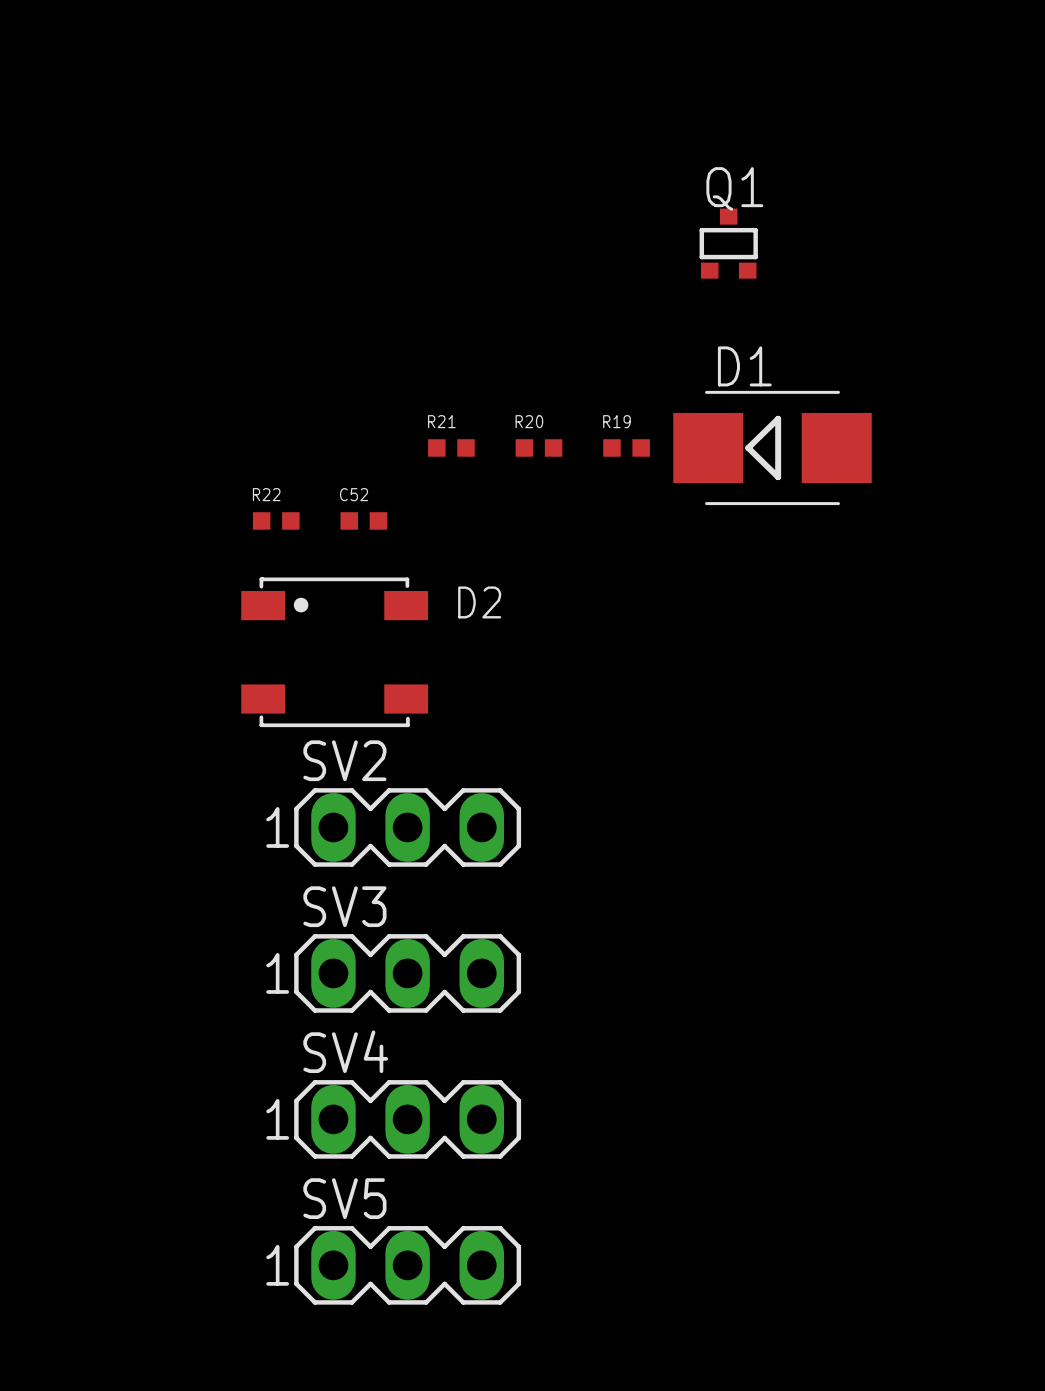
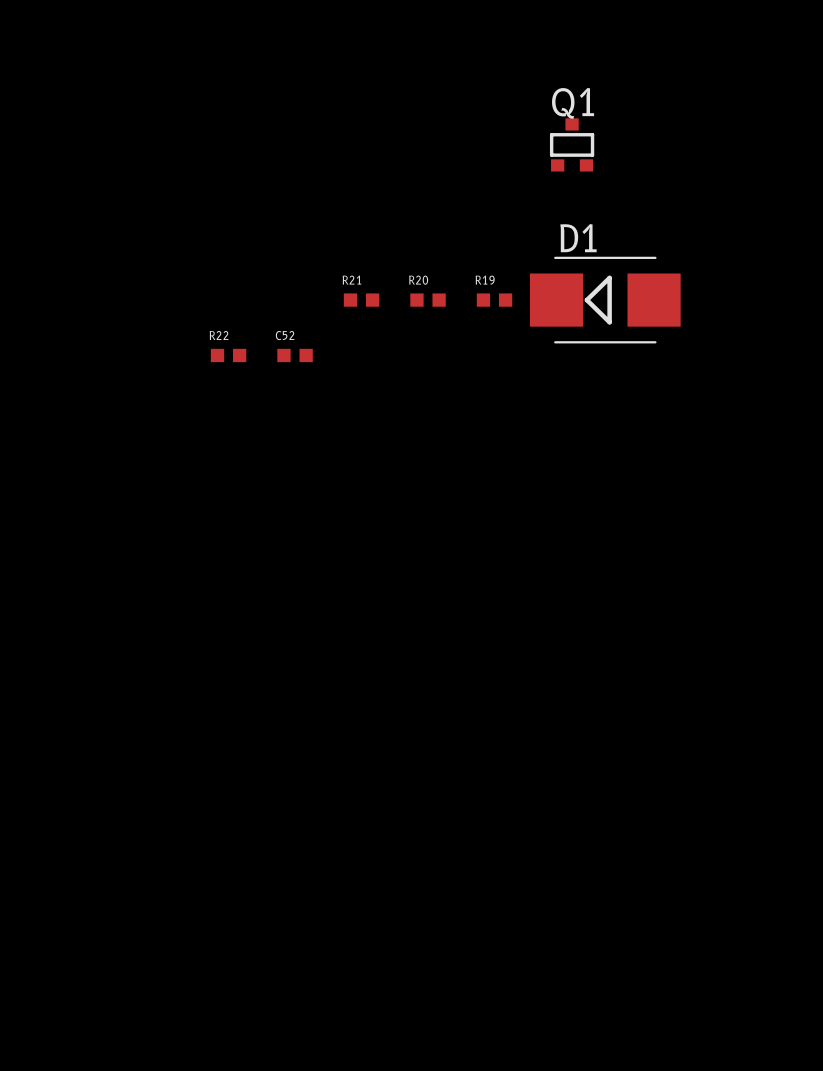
D2: (334, 652) -> none
SV2: (407, 827) -> none
SV3: (407, 973) -> none
SV4: (407, 1119) -> none
SV5: (407, 1265) -> none

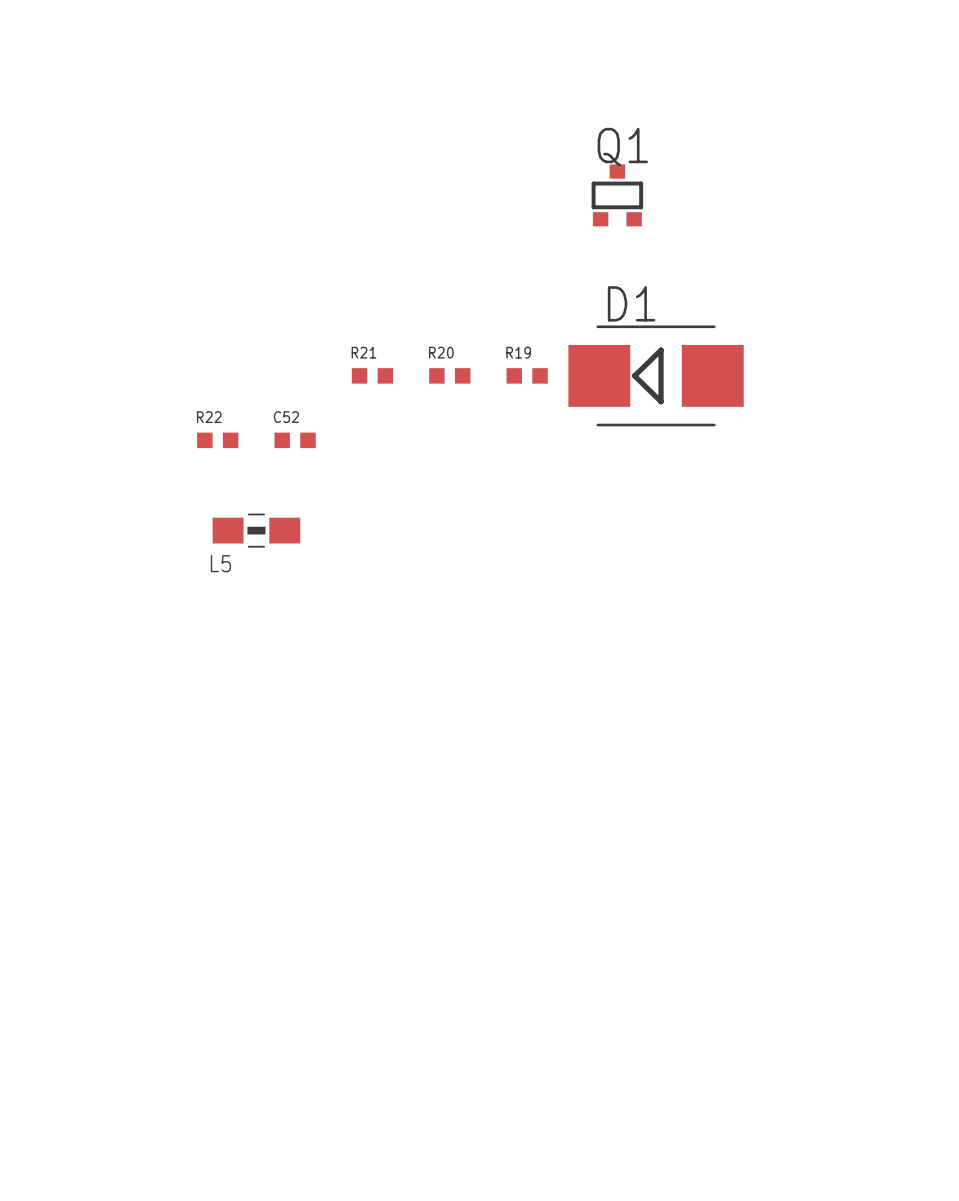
L5: none -> (256, 530)

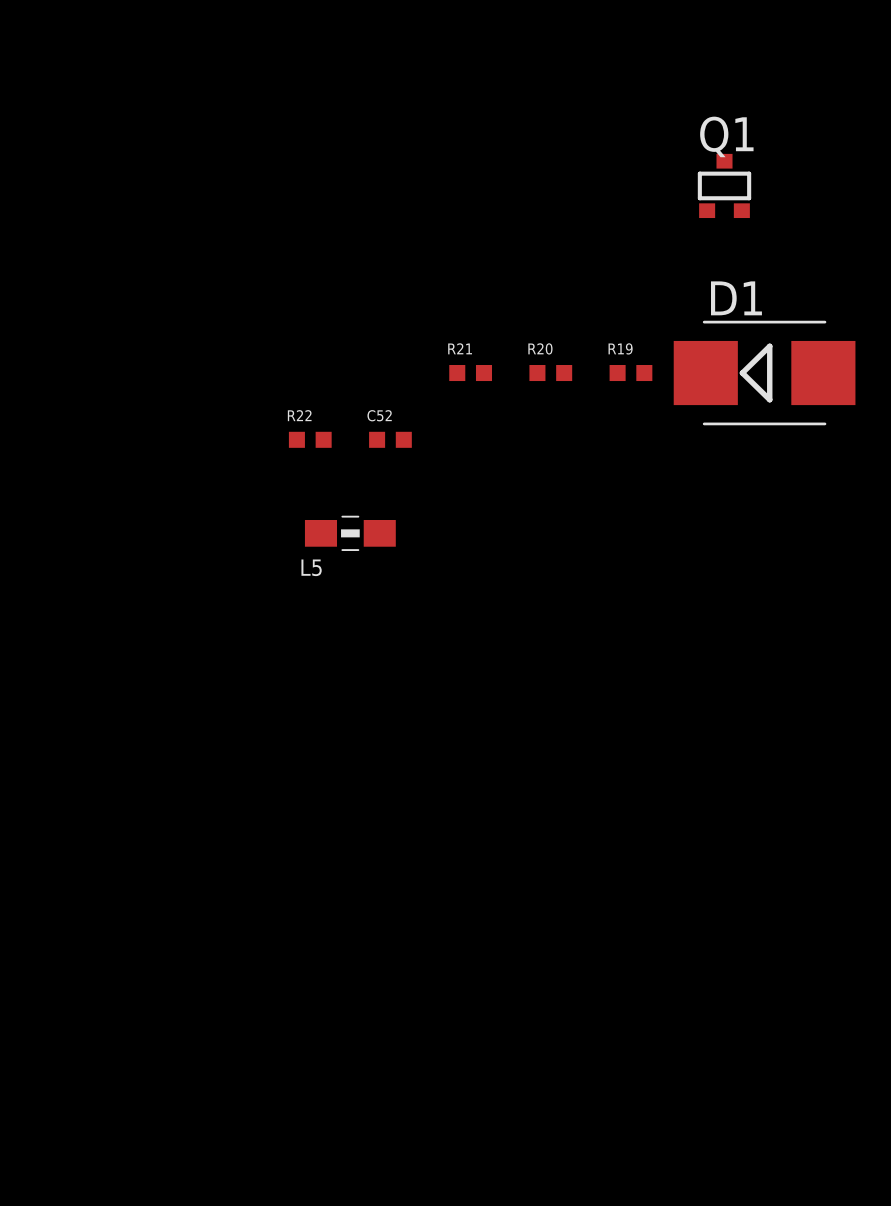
Q1 position: (617, 195) -> (724, 185)
R20 name: R20 (441, 352) -> R21 (460, 348)
R19 name: R19 (518, 352) -> R20 (540, 348)
R21: (372, 375) -> none
R19: none -> (630, 373)
D1 position: (656, 375) -> (764, 373)
C52 name: C52 (286, 417) -> R22 (299, 415)
R22: (217, 440) -> none
C52: none -> (390, 439)
L5 position: (256, 530) -> (350, 533)

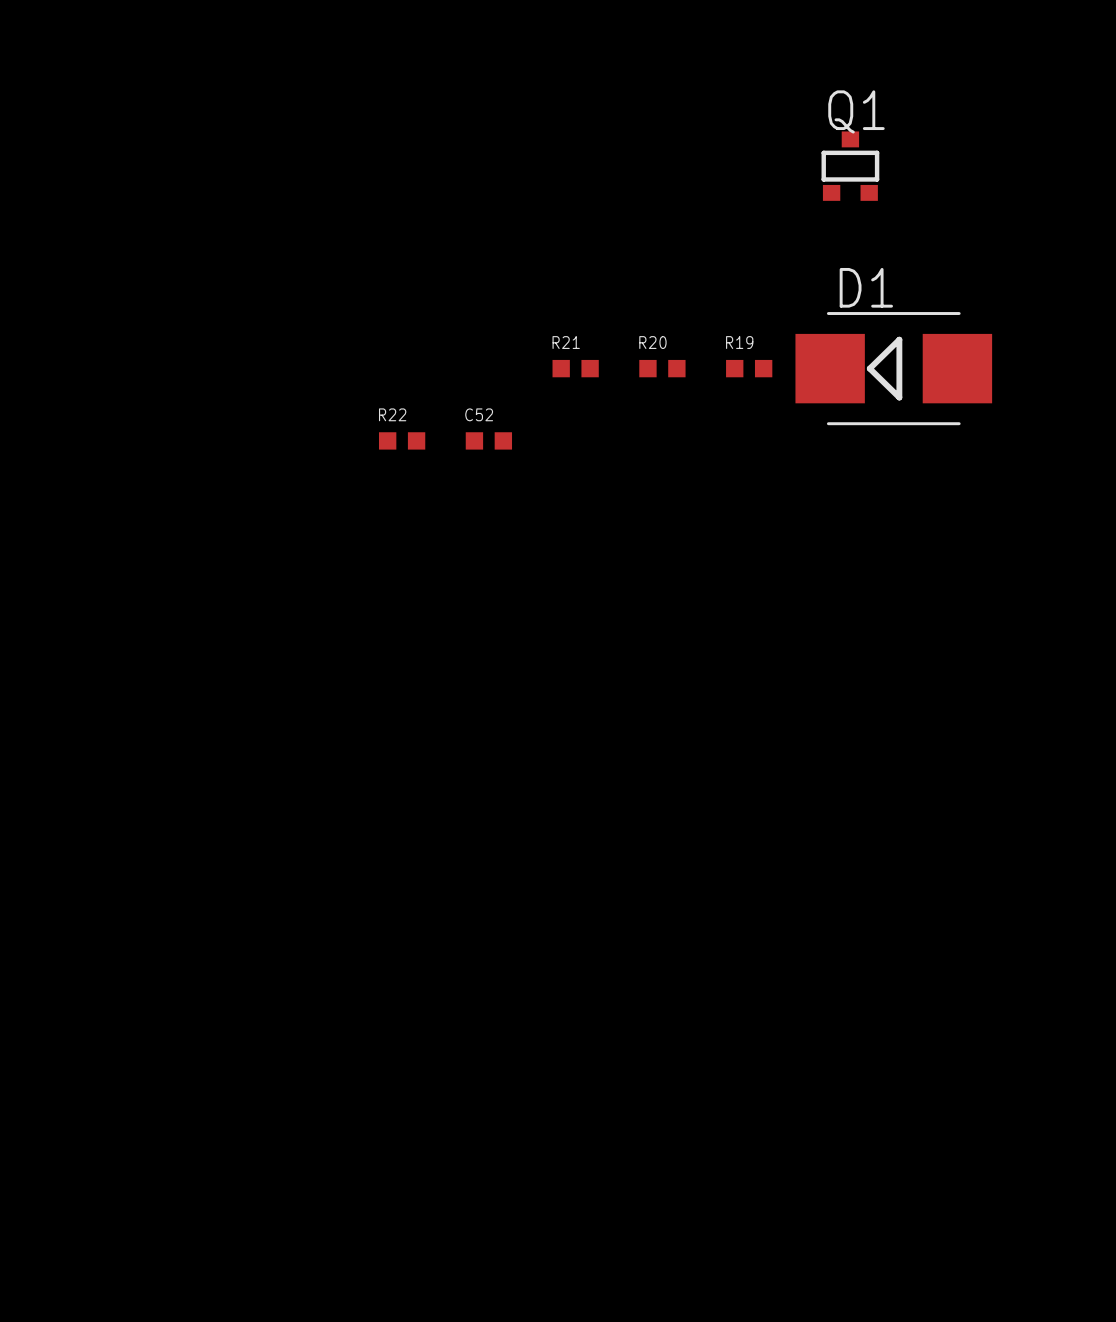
L5: (350, 533) -> none

